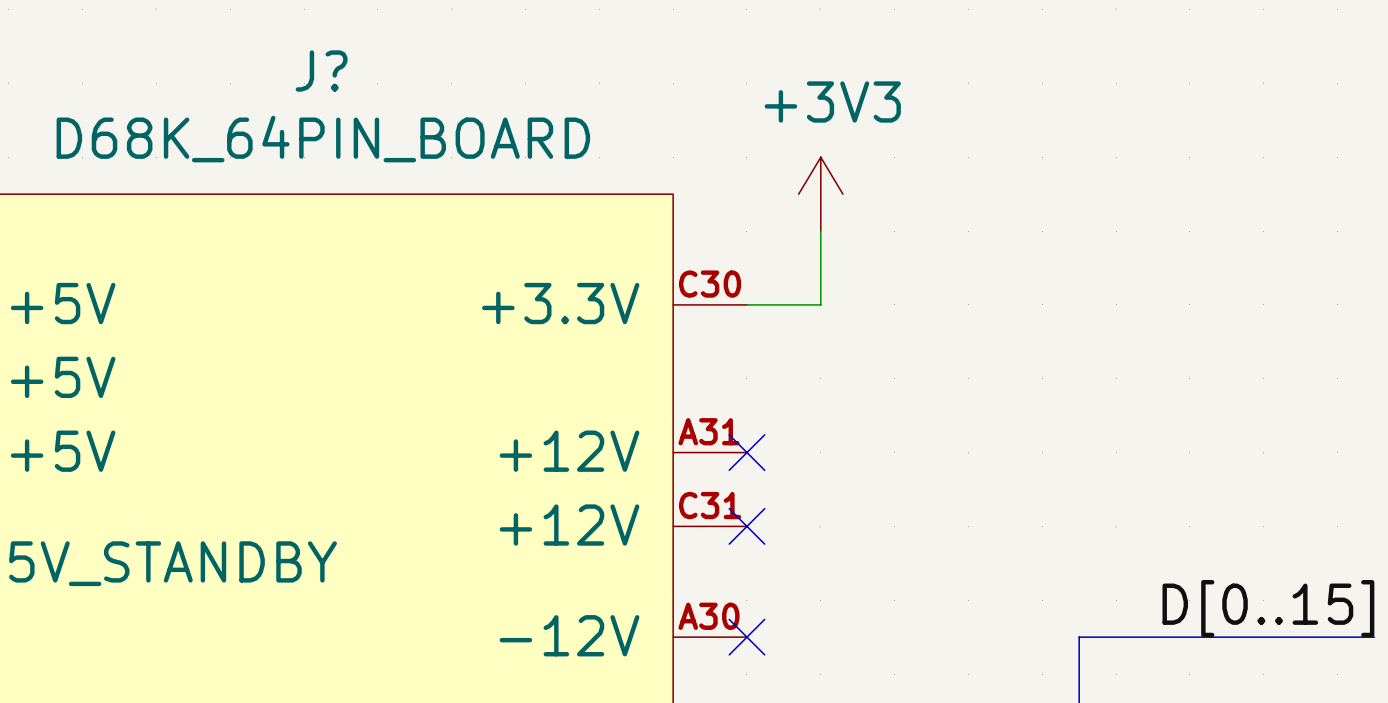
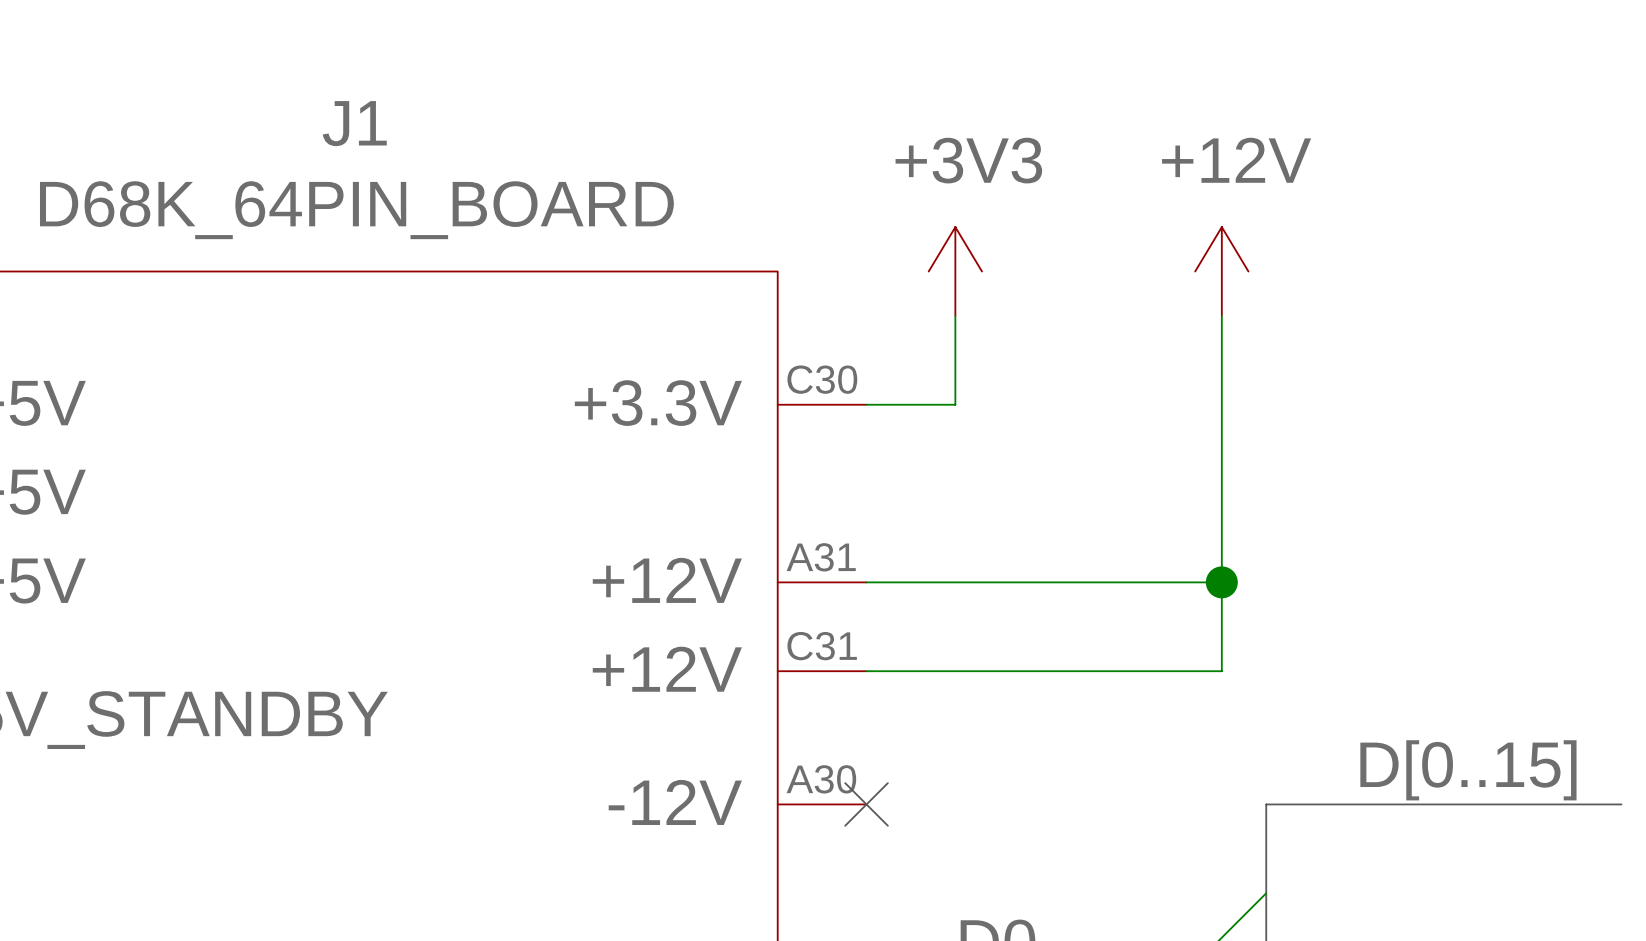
J? name: J? (321, 70) -> J1 (354, 123)
power symbol: none -> +12V (1221, 271)
wire: none -> (1221, 315) (1221, 671) (866, 671)
wire: none -> (866, 582) (1221, 582)
no-connect mark: (746, 452) -> none
junction: none -> (1221, 582)
no-connect mark: (746, 526) -> none

